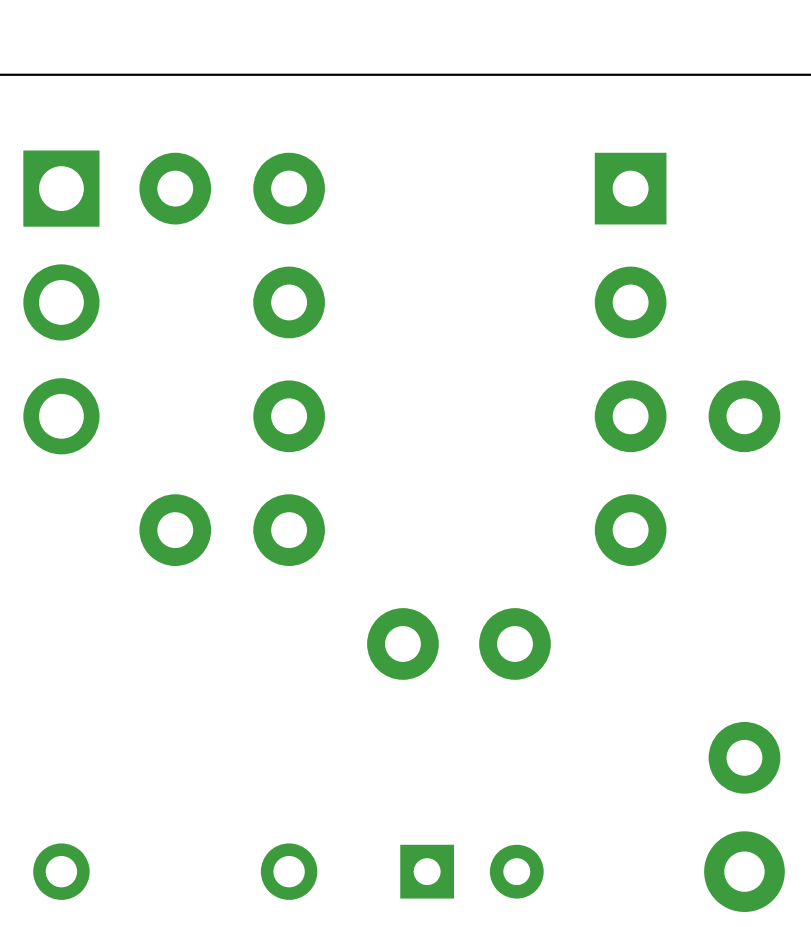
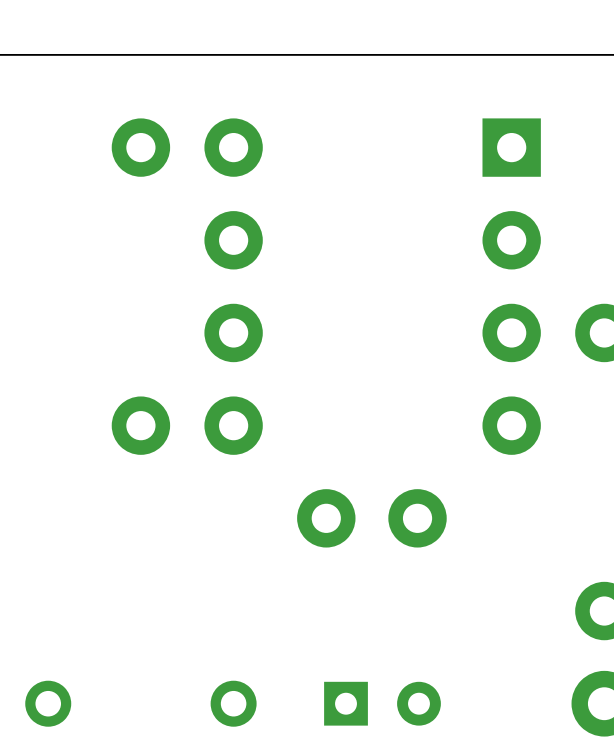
part: (61, 302) -> none

